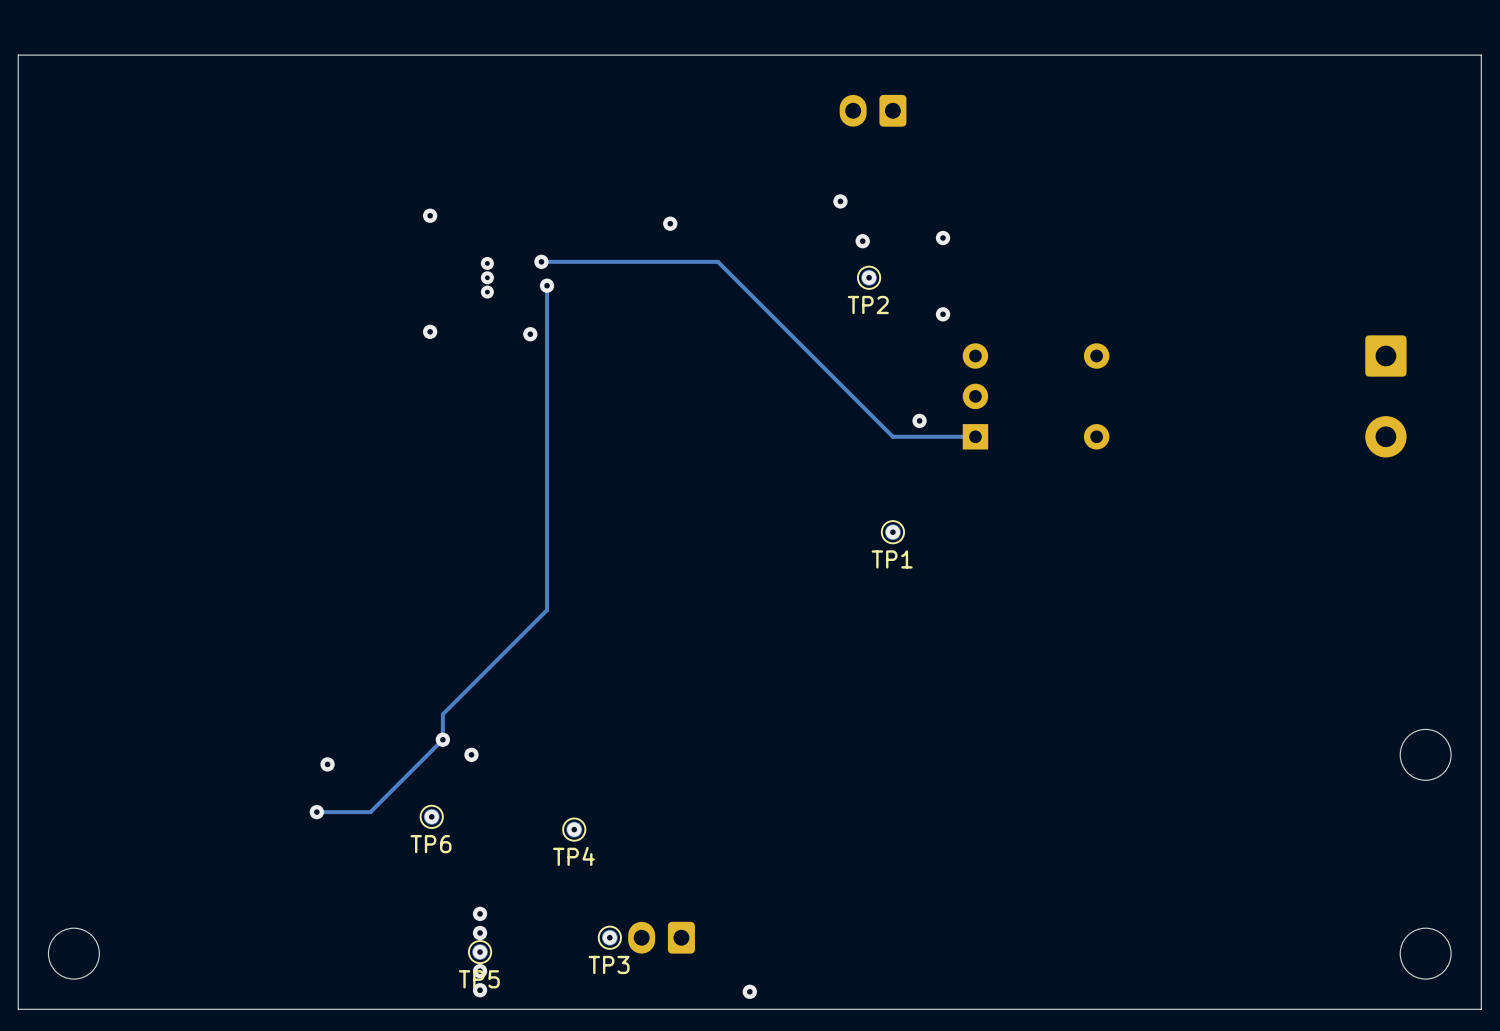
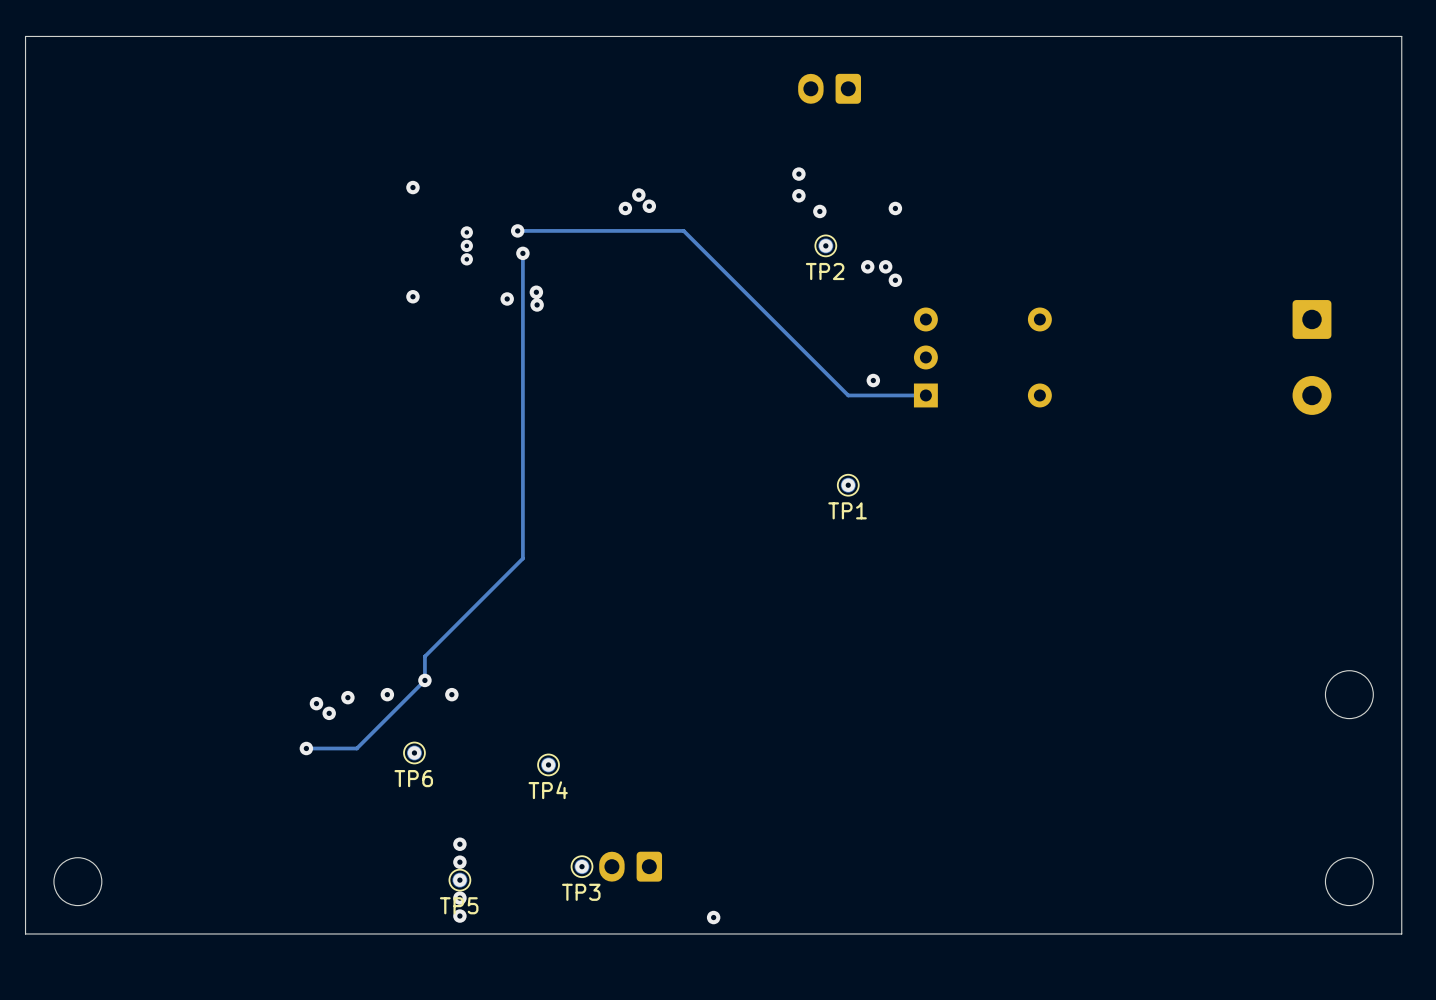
via: none -> (798, 195)
via: none -> (649, 206)
via: none -> (625, 208)
via: none -> (867, 266)
via: none -> (885, 266)
via: none -> (536, 292)
via: none -> (537, 304)
via: none -> (387, 694)
via: none -> (347, 697)
via: none -> (329, 713)

